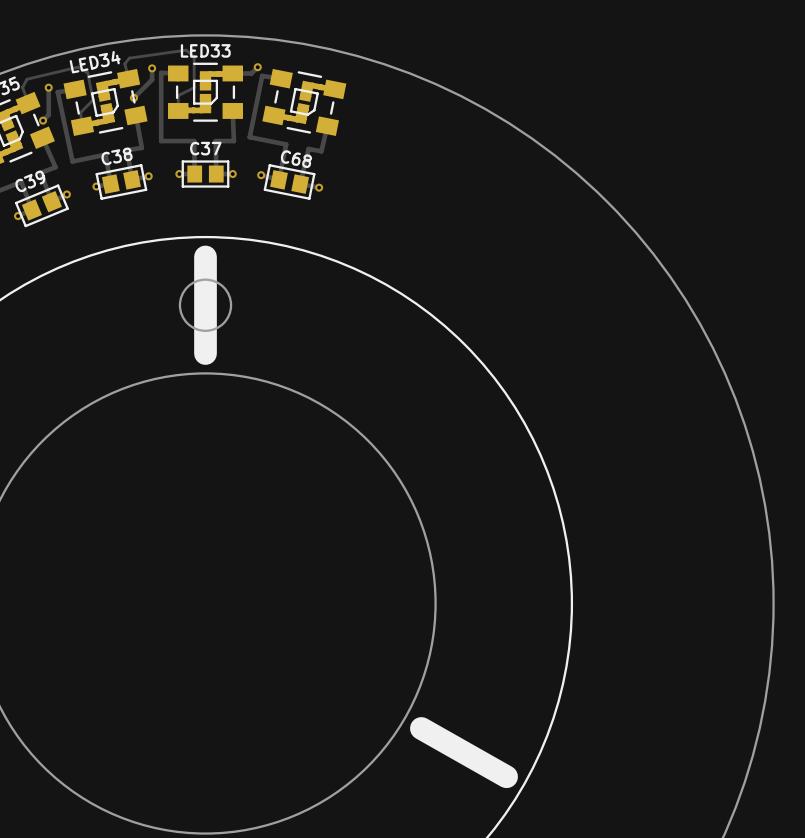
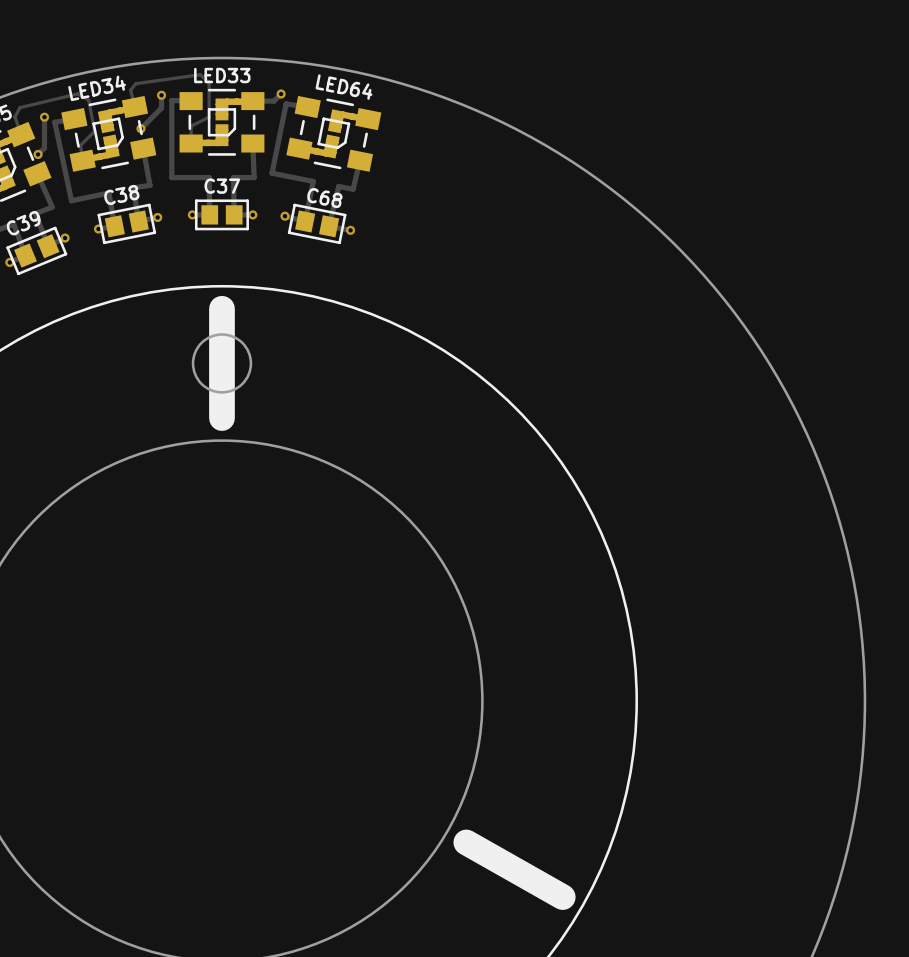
LED64 name: none -> LED64 (344, 87)

